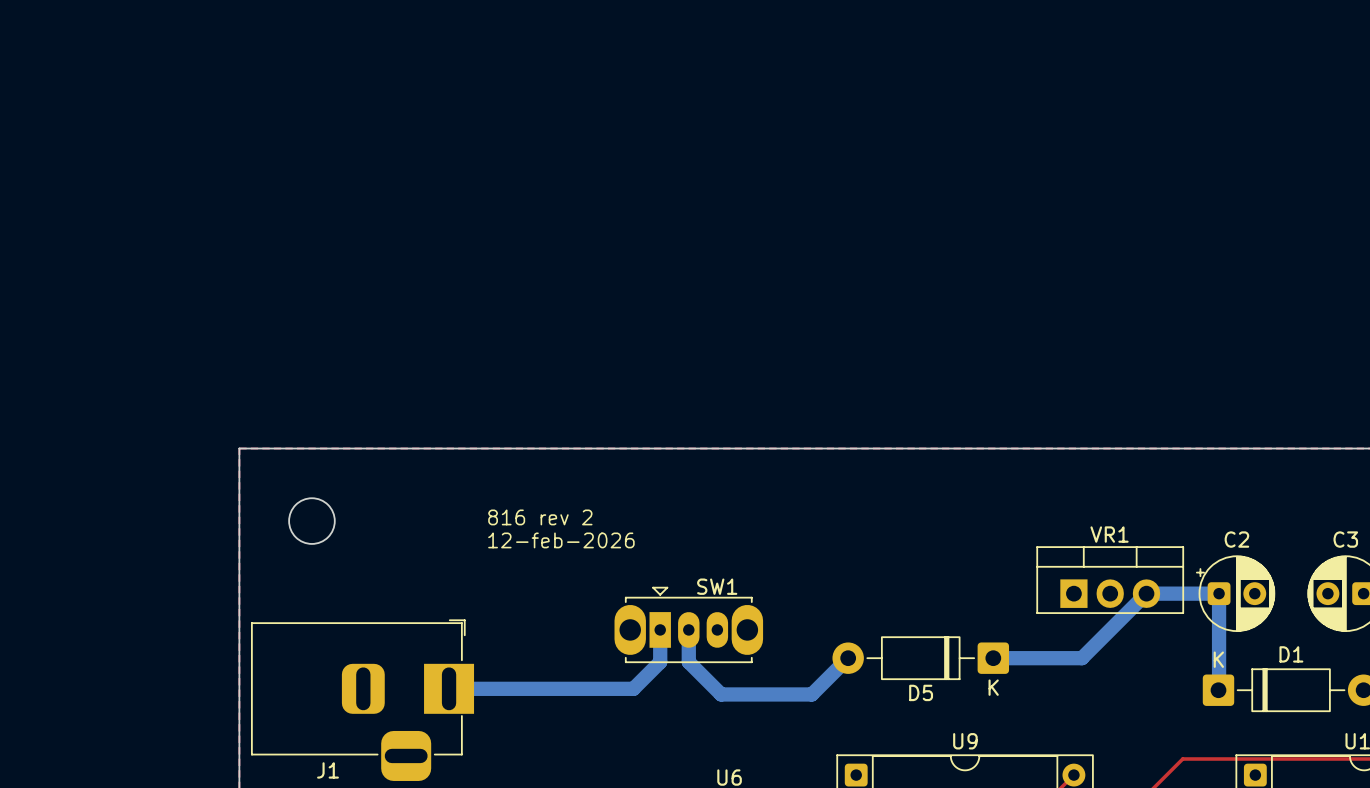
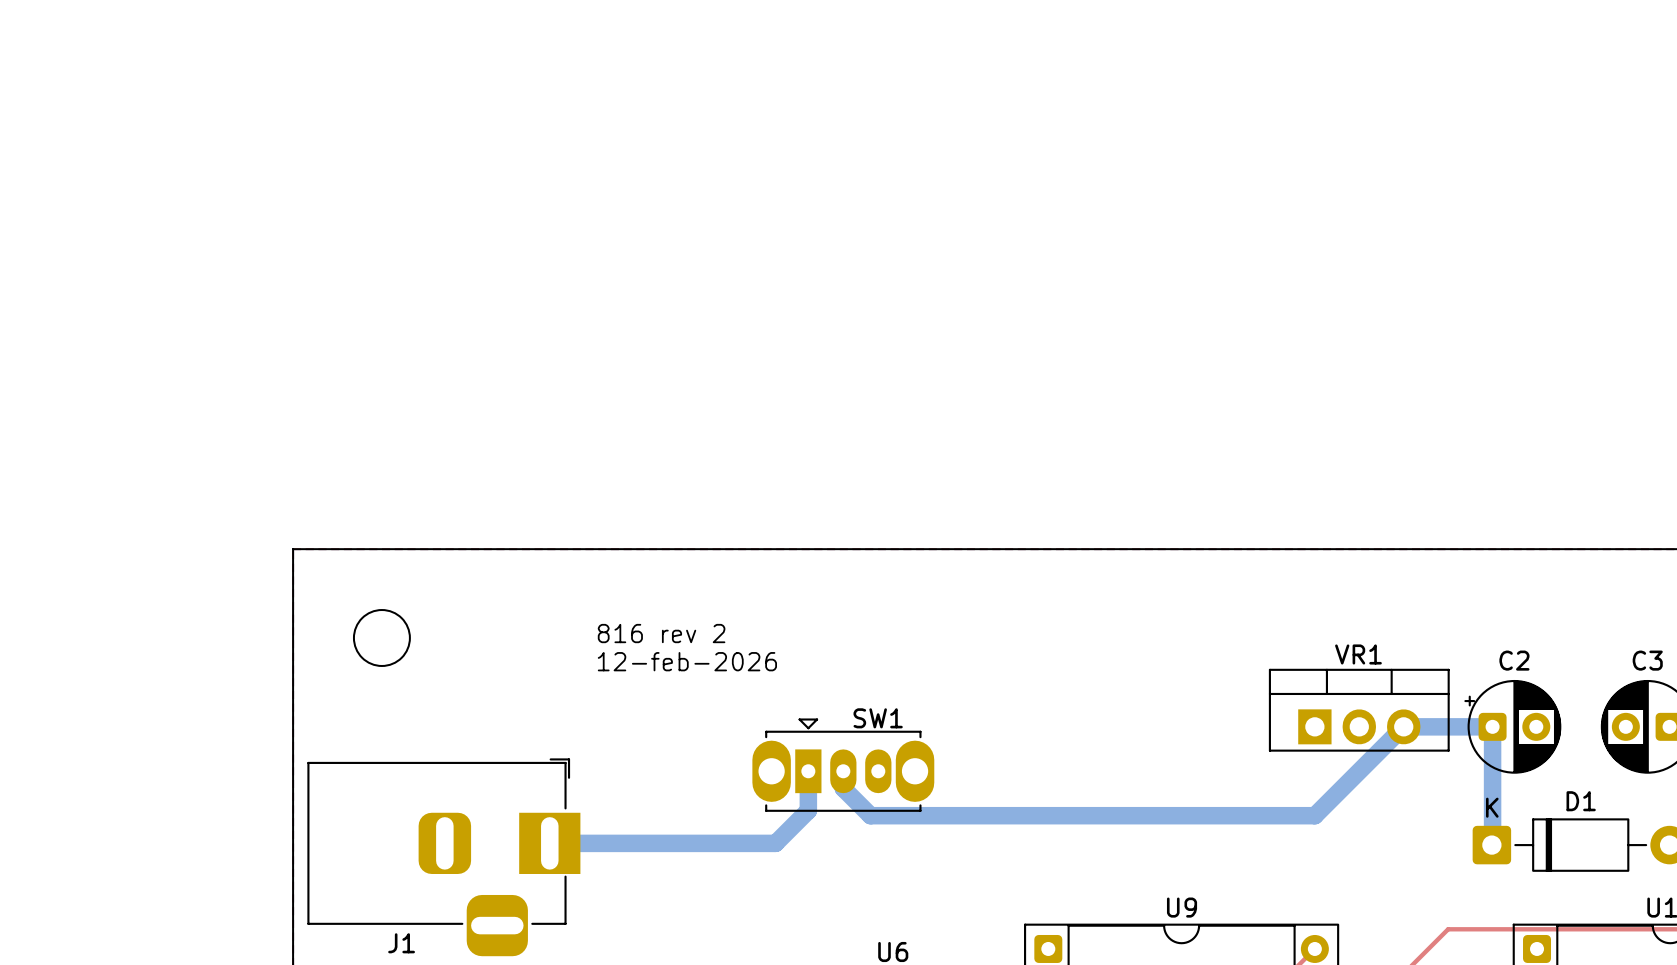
bottom track: (688, 643) (688, 662) (721, 694) (811, 694) (848, 658) -> (843, 788) (870, 815) (1314, 815) (1324, 805)
D5: (920, 658) -> none
bottom track: (993, 658) (1081, 658) -> none

